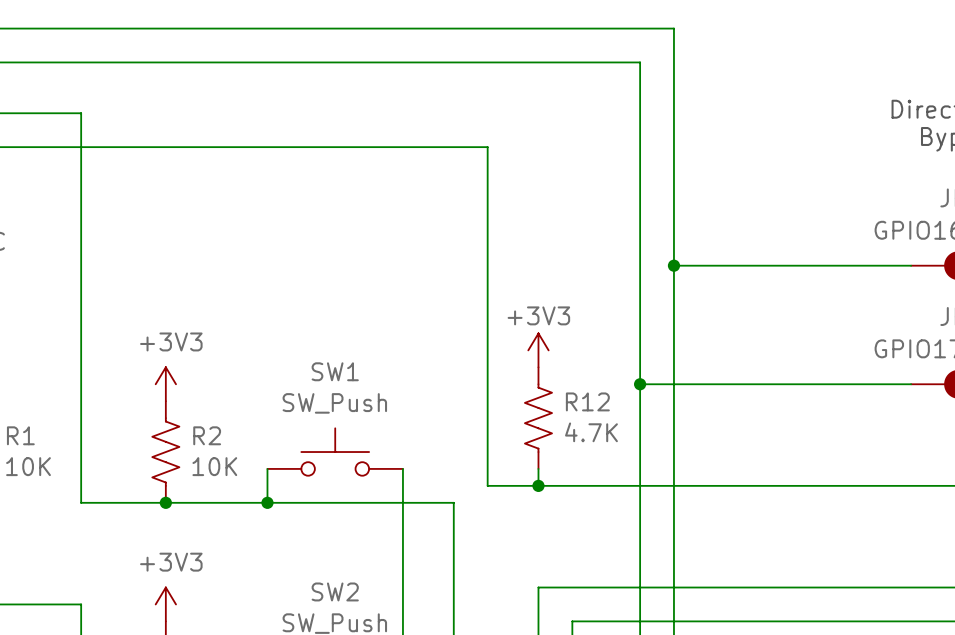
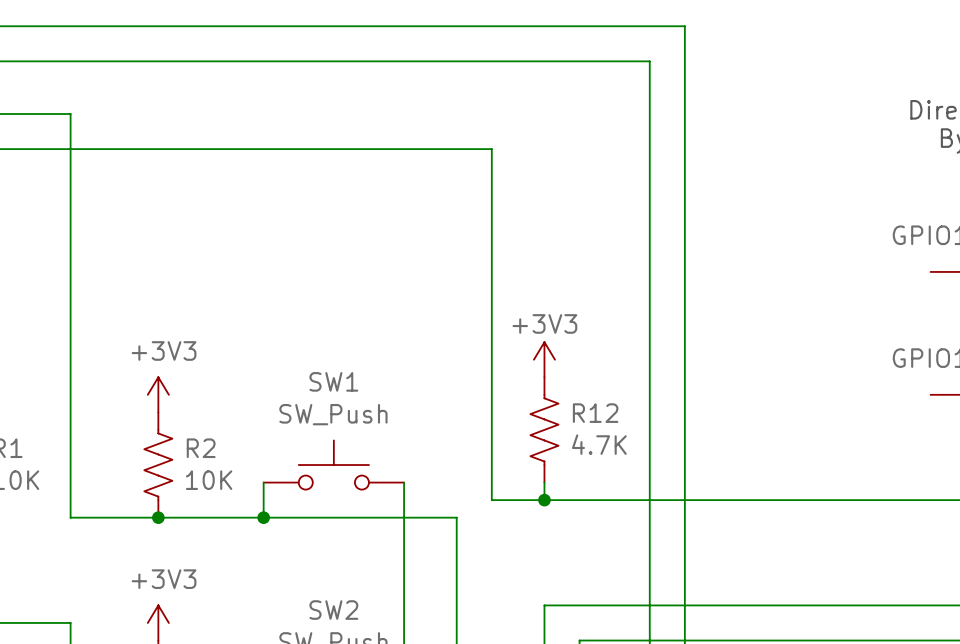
wire: (673, 265) (911, 265) -> none
junction: (673, 265) -> none
wire: (640, 384) (911, 384) -> none
junction: (640, 384) -> none

